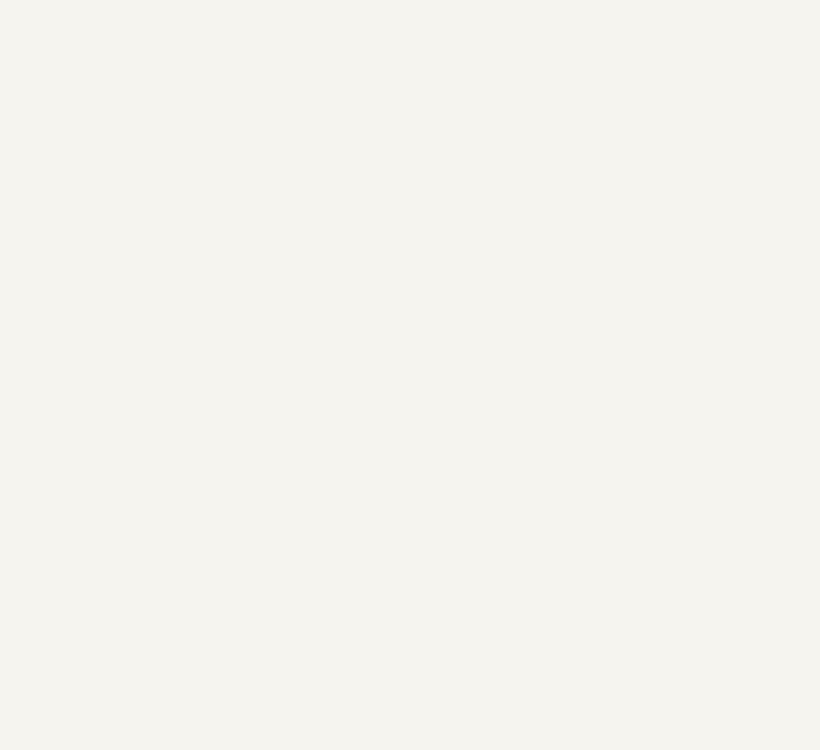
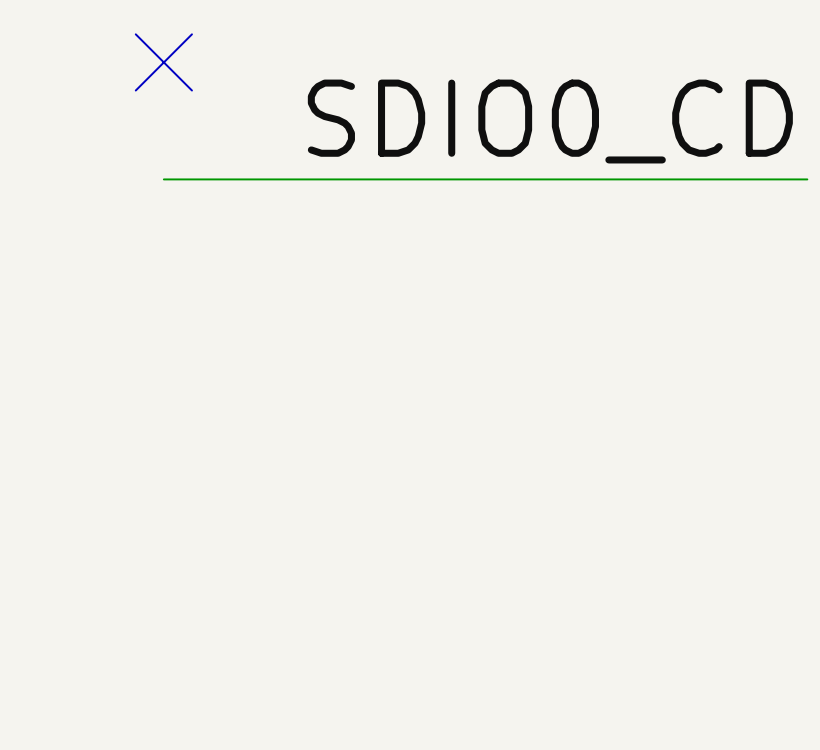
no-connect mark: none -> (163, 62)
label: none -> SDIO0_CD (550, 121)
wire: none -> (163, 179) (807, 179)

